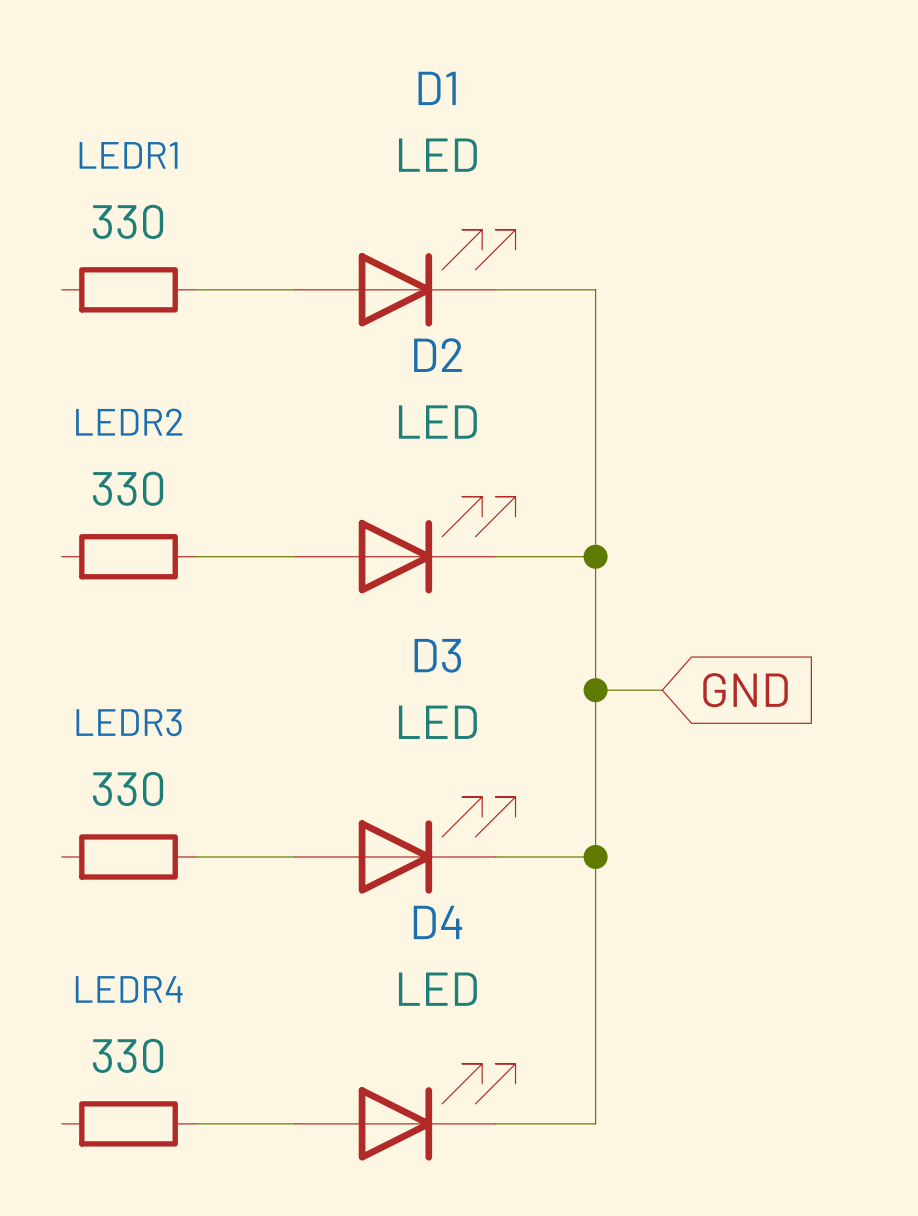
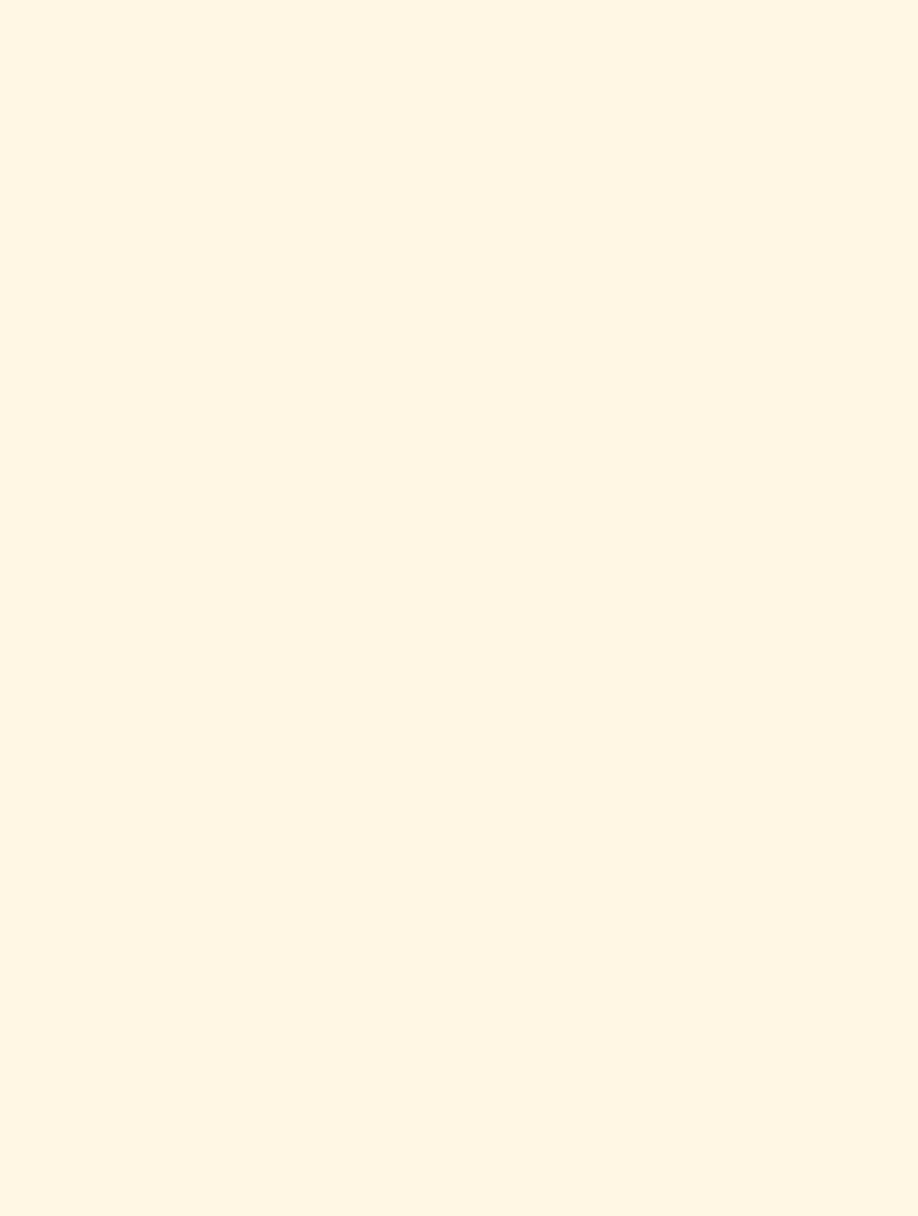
D1: LED (405, 278) -> none
LEDR1: 330 (128, 289) -> none
wire: (195, 289) (295, 289) -> none
wire: (495, 289) (595, 289) (595, 1123) (495, 1123) -> none
D2: LED (405, 545) -> none
LEDR2: 330 (128, 556) -> none
wire: (195, 556) (295, 556) -> none
wire: (495, 556) (595, 556) -> none
junction: (595, 556) -> none
wire: (595, 690) (662, 690) -> none
junction: (595, 690) -> none
global label: GND (745, 690) -> none
D3: LED (405, 845) -> none
LEDR3: 330 (128, 856) -> none
wire: (195, 856) (295, 856) -> none
wire: (495, 856) (595, 856) -> none
junction: (595, 856) -> none
D4: LED (405, 1112) -> none
LEDR4: 330 (128, 1123) -> none
wire: (195, 1123) (295, 1123) -> none

